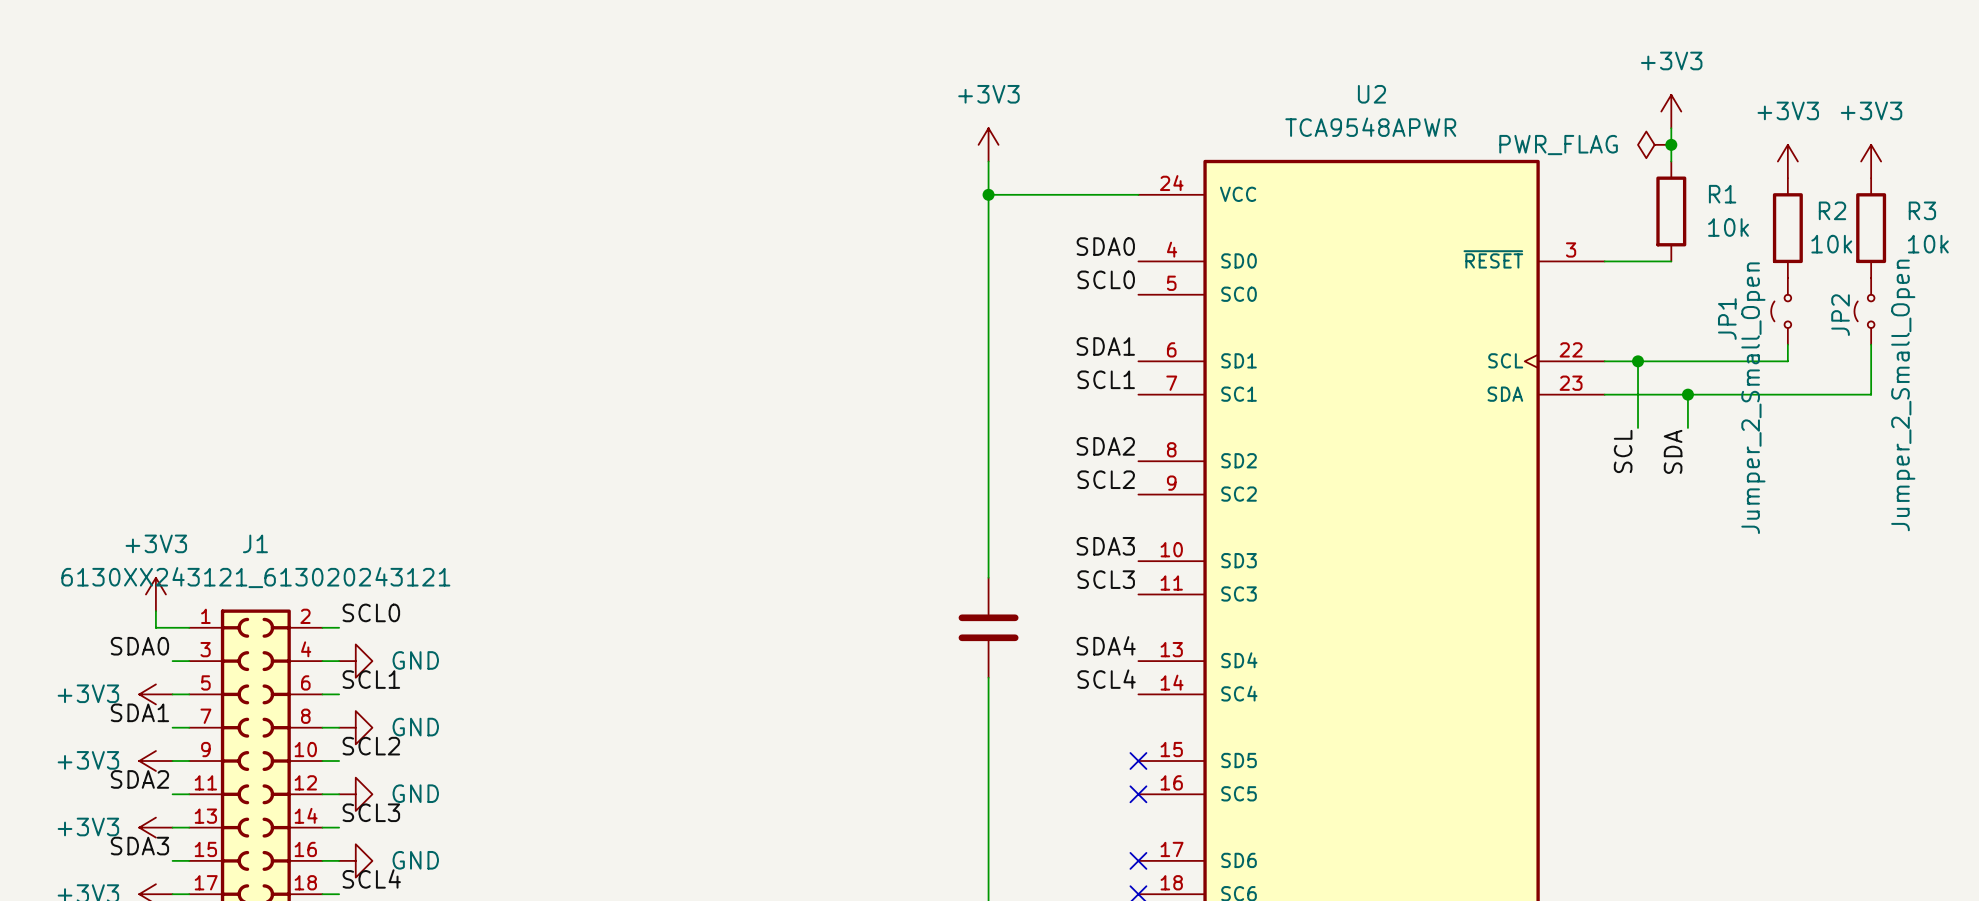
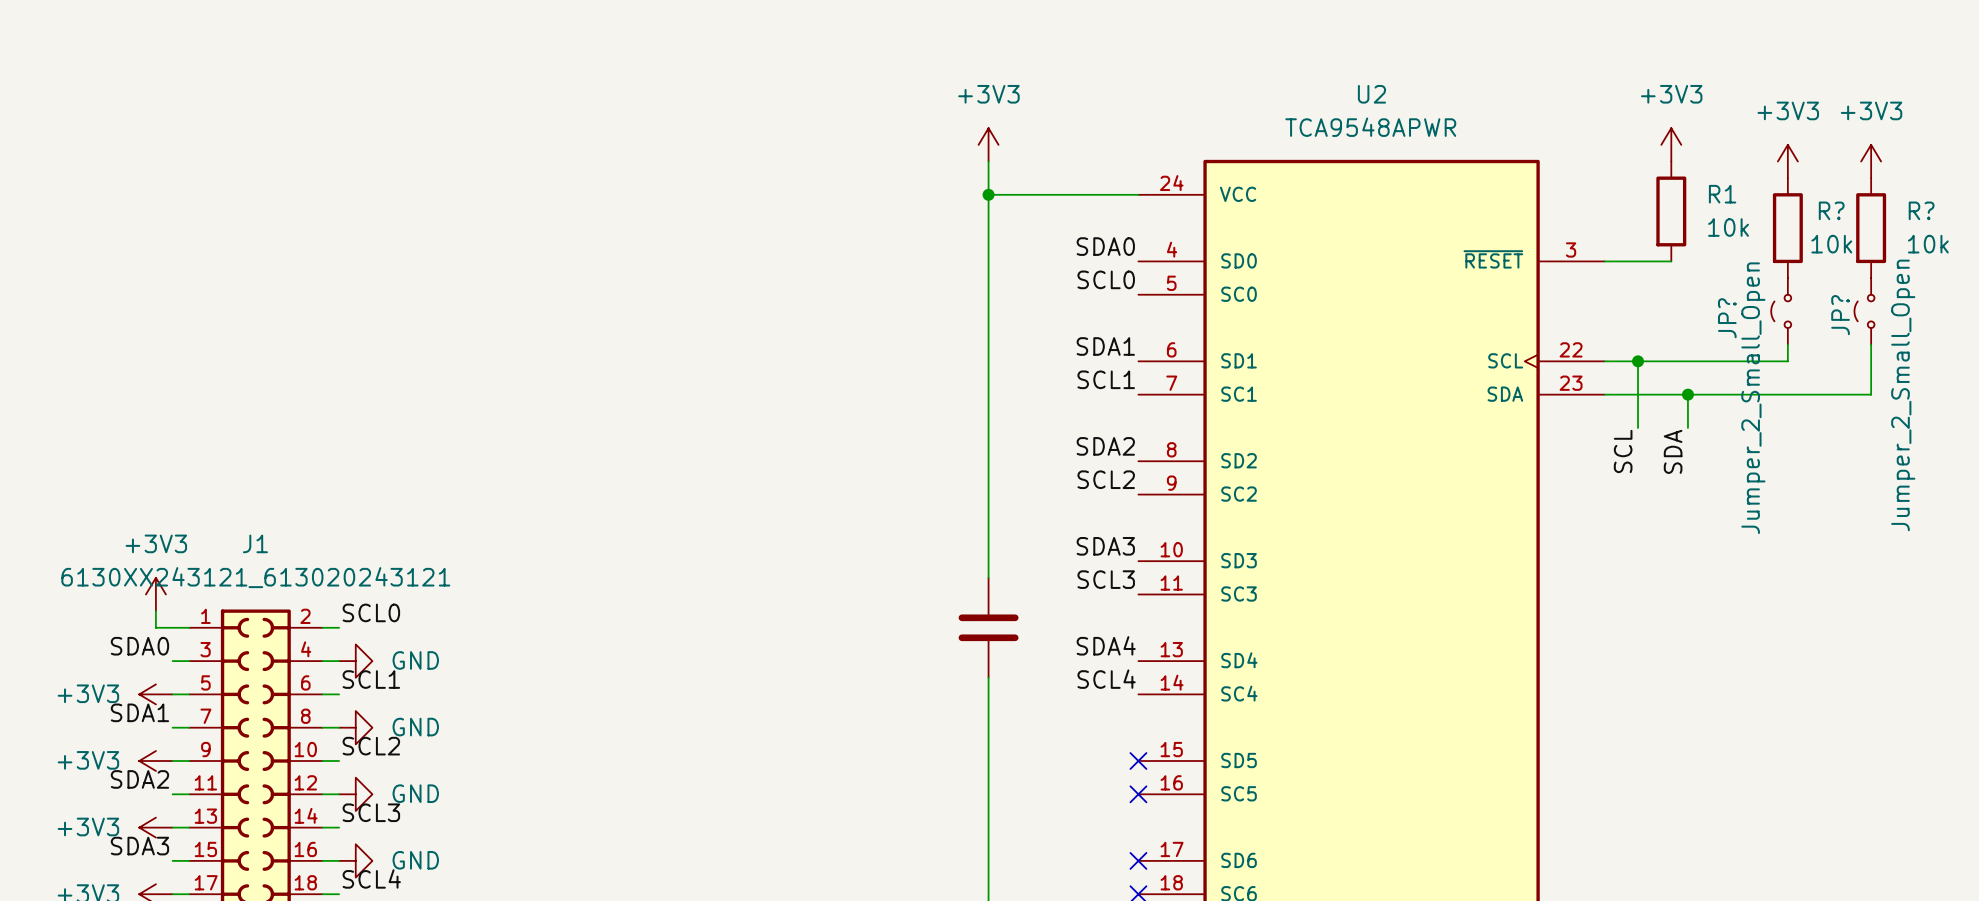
power symbol position: +3V3 (1671, 111) -> +3V3 (1671, 144)
power symbol: PWR_FLAG (1654, 144) -> none
junction: (1671, 144) -> none
R2 name: R2 (1832, 210) -> R? (1831, 210)
R3 name: R3 (1922, 210) -> R? (1921, 210)
JP2 name: JP2 (1840, 315) -> JP? (1840, 315)
JP1 name: JP1 (1727, 319) -> JP? (1727, 318)

